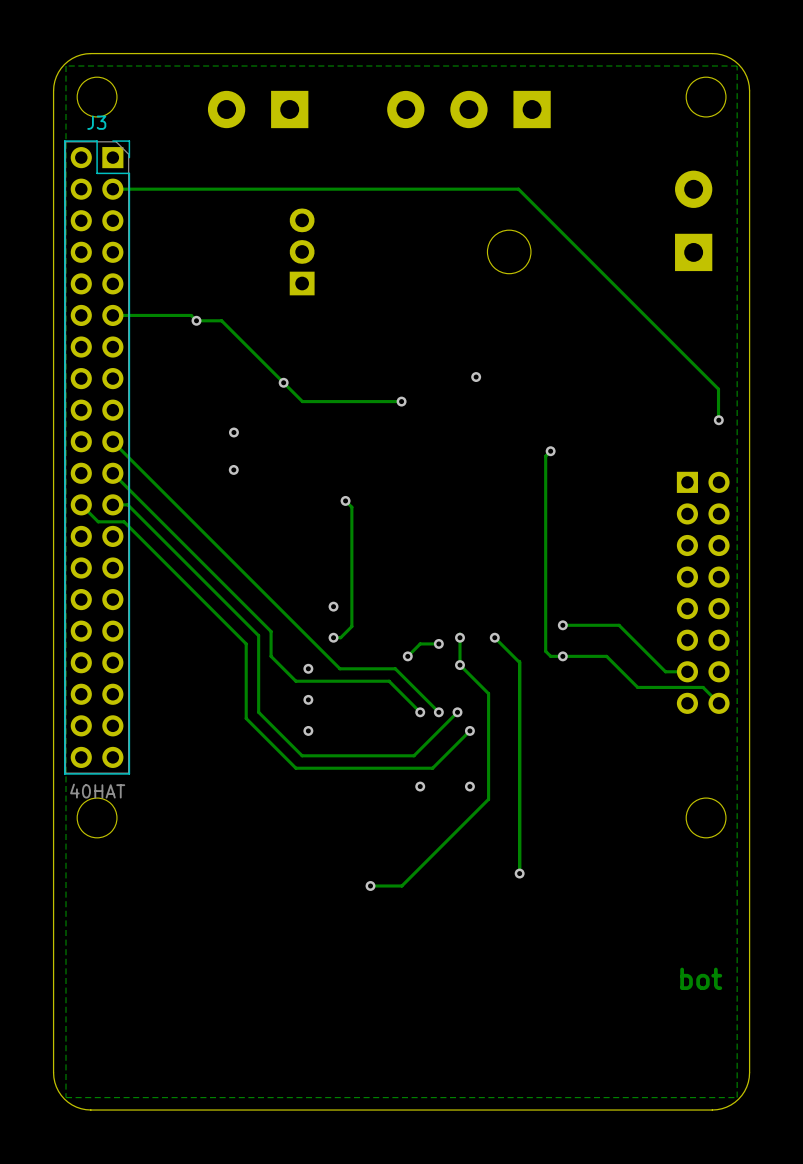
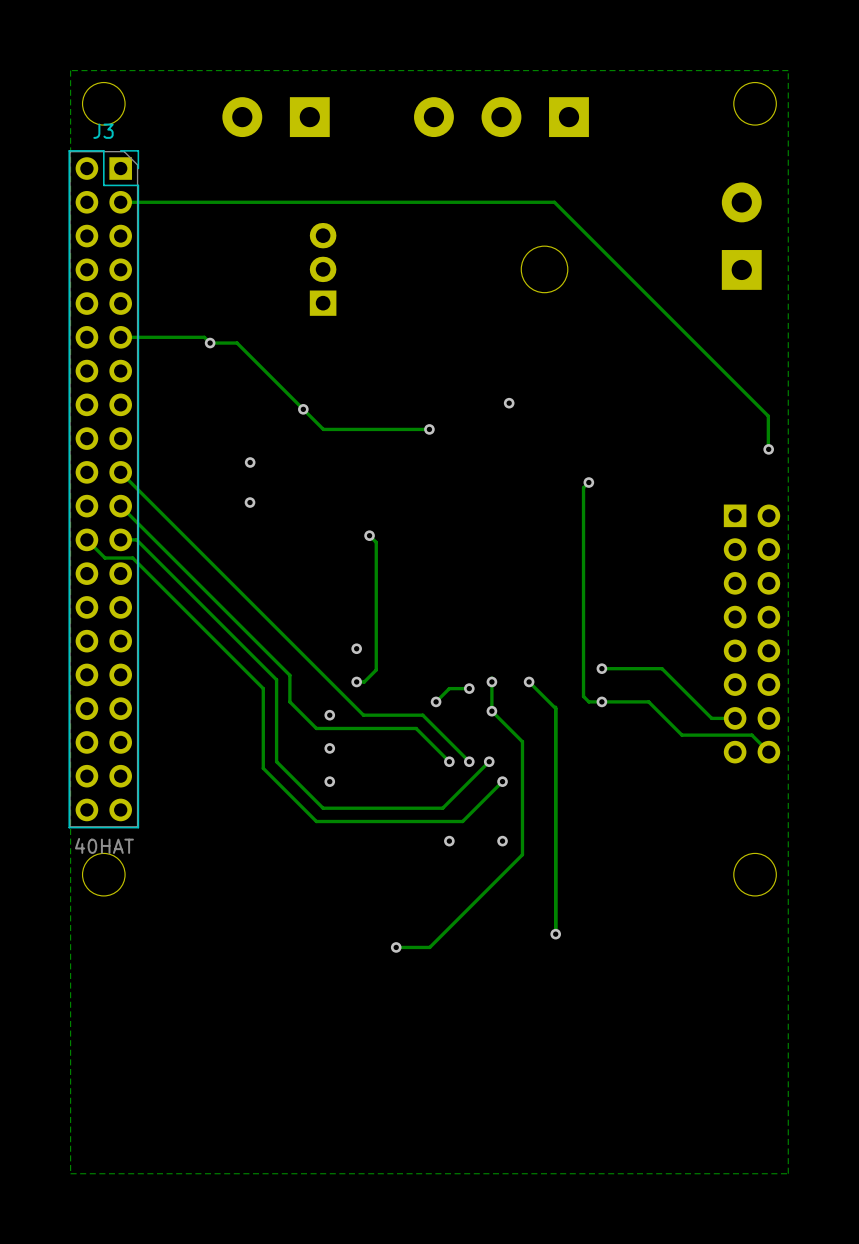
board edge: (712, 53) (90, 53) (72, 58) (58, 72) (53, 90) (53, 1072) (58, 1091) (72, 1105) (90, 1110) (712, 1110) (730, 1105) (744, 1091) (749, 1072) (749, 90) (746, 76) (738, 64) (726, 56) (712, 53) -> none
text: bot (701, 978) -> none

